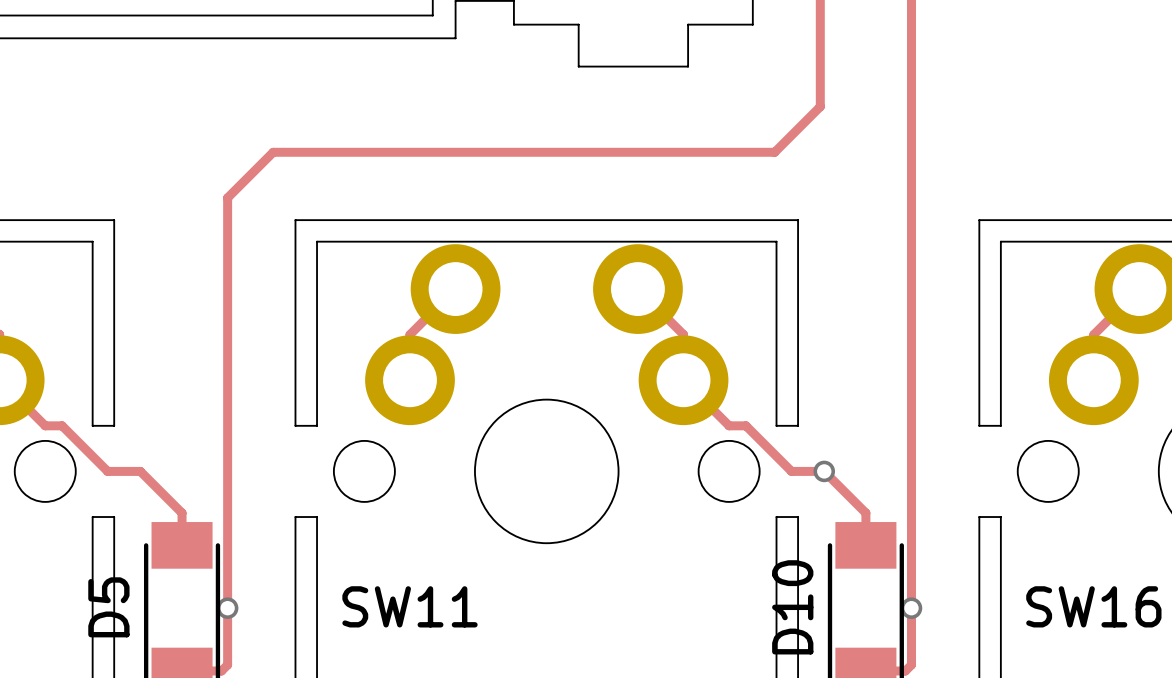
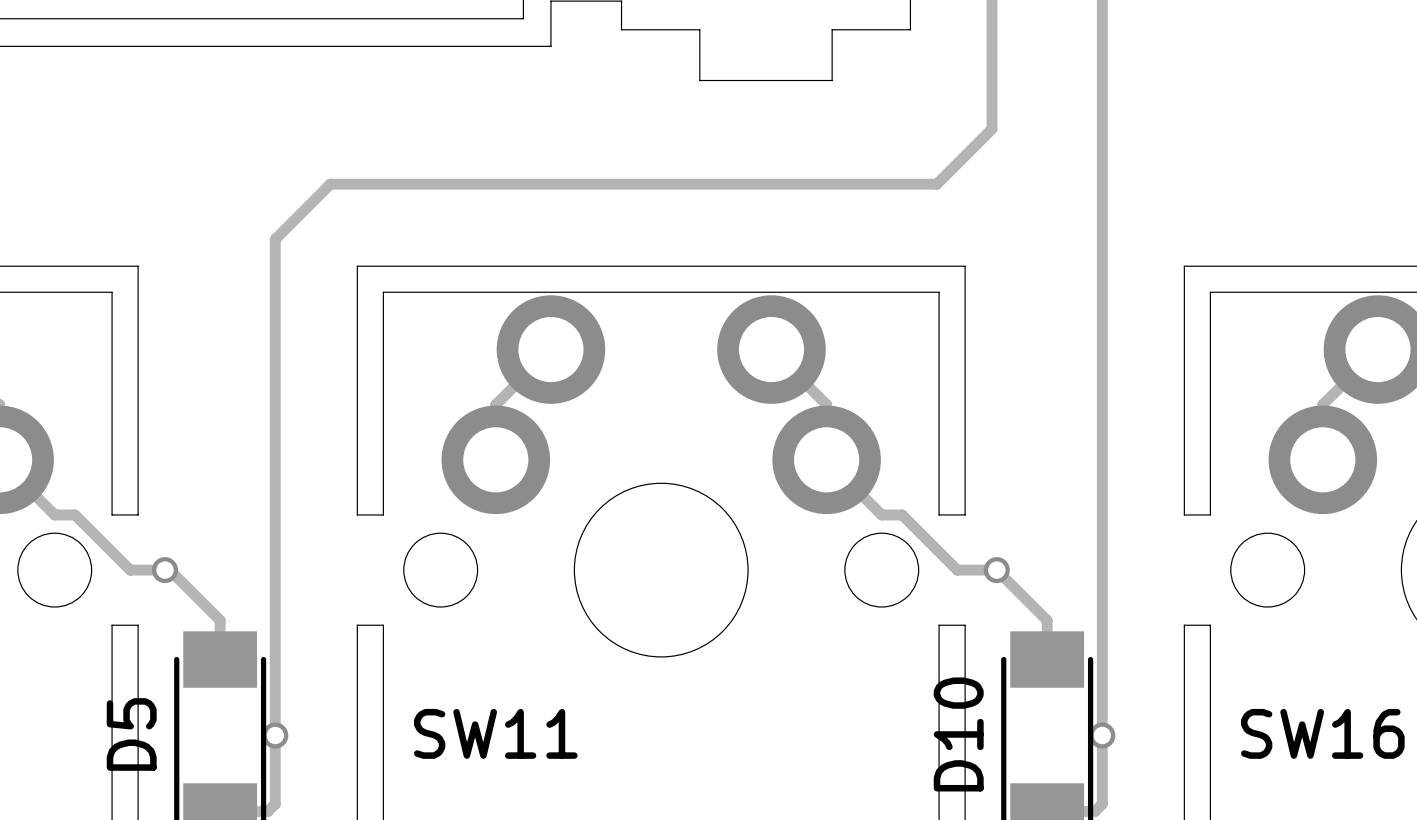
via: none -> (165, 570)

